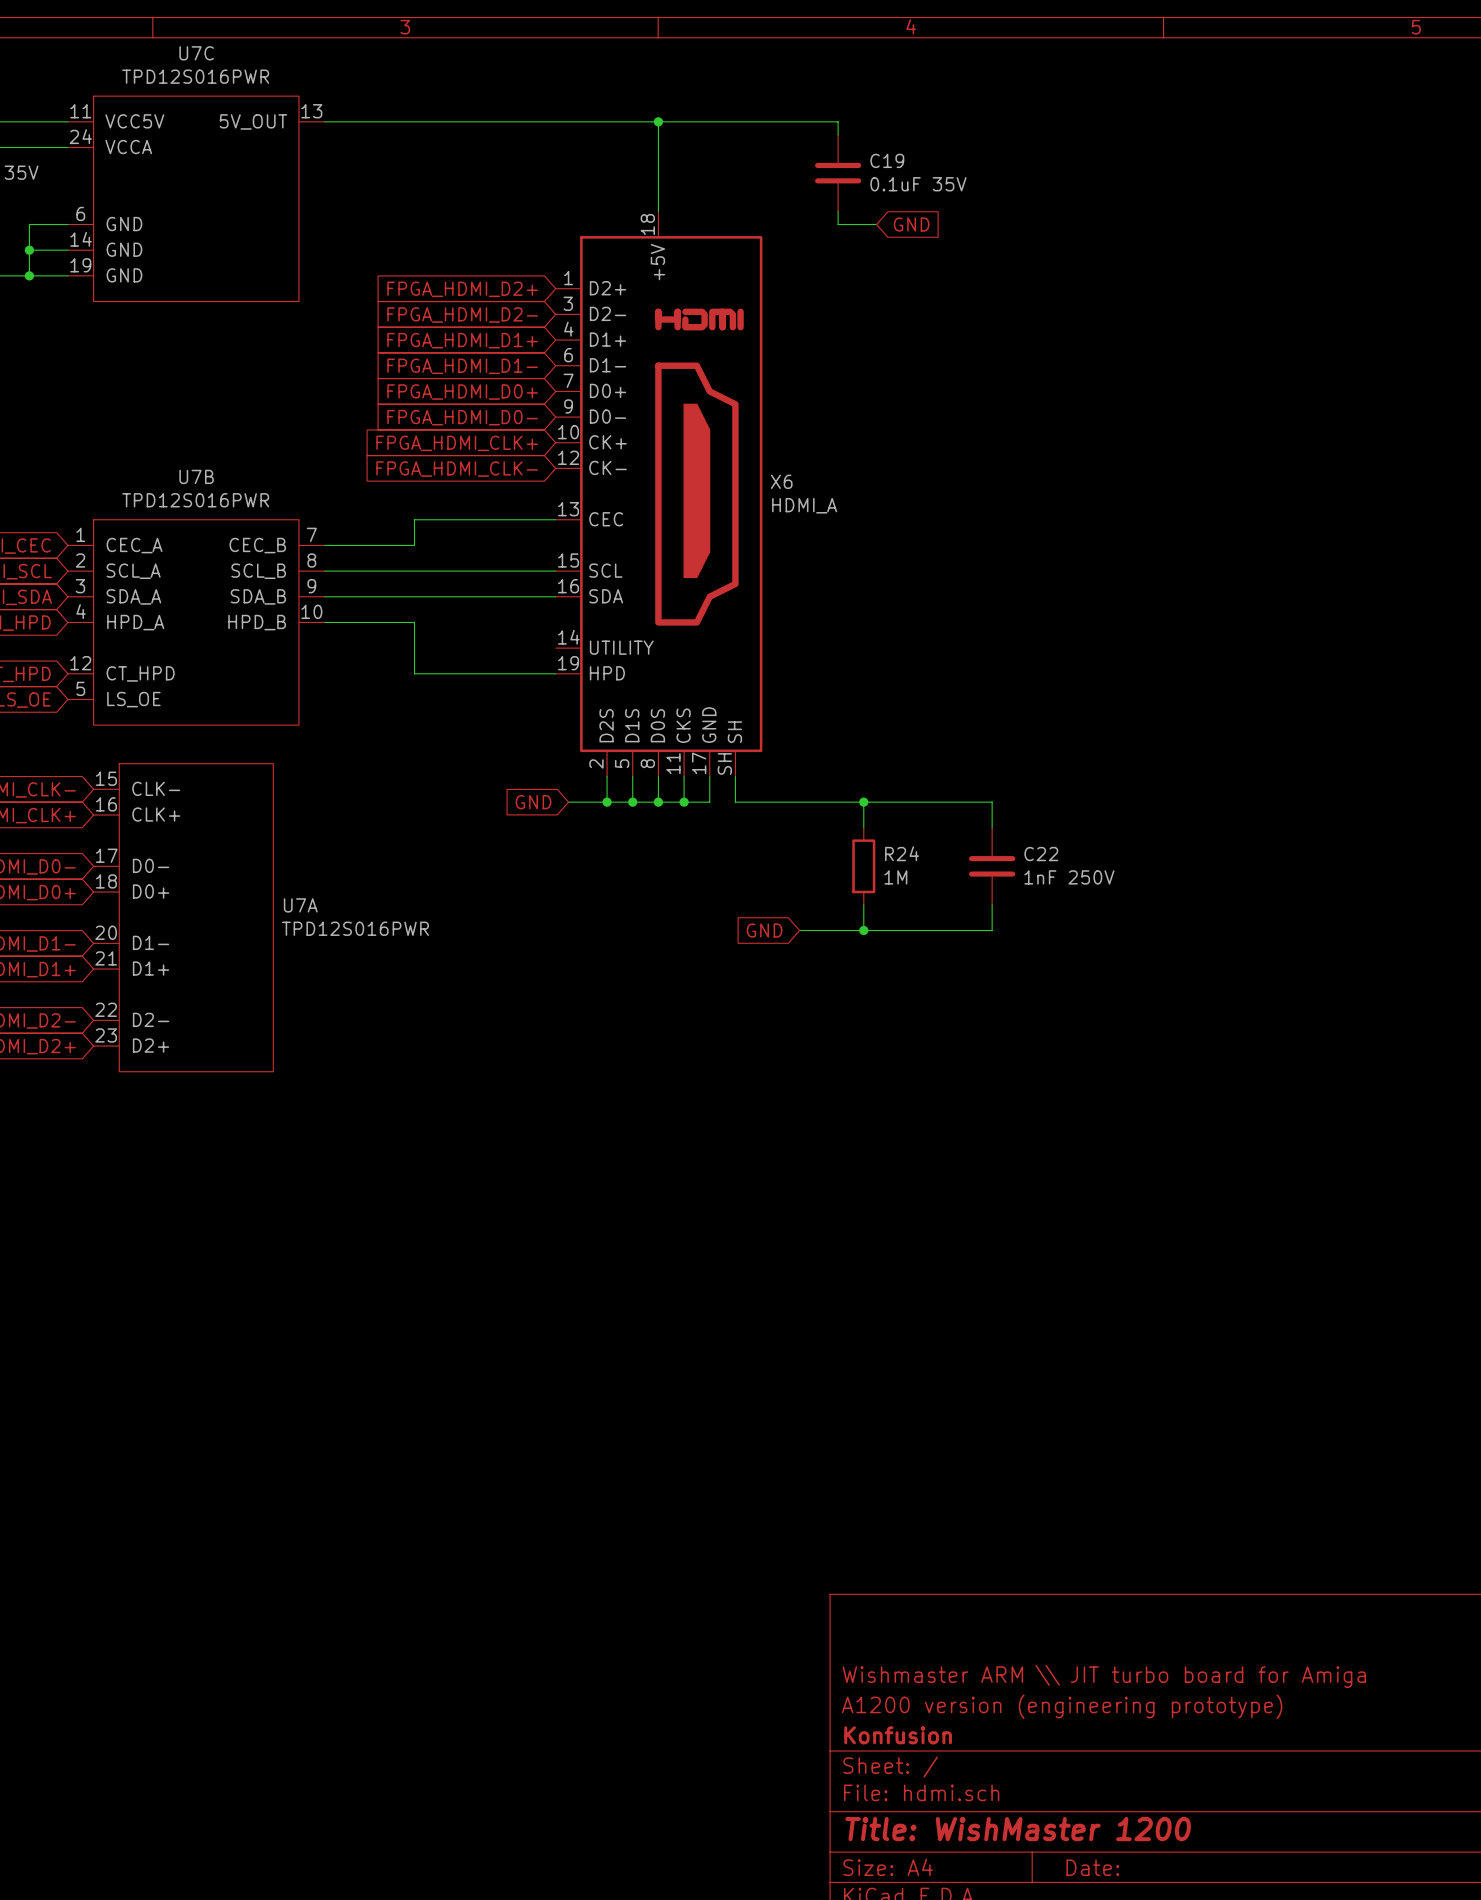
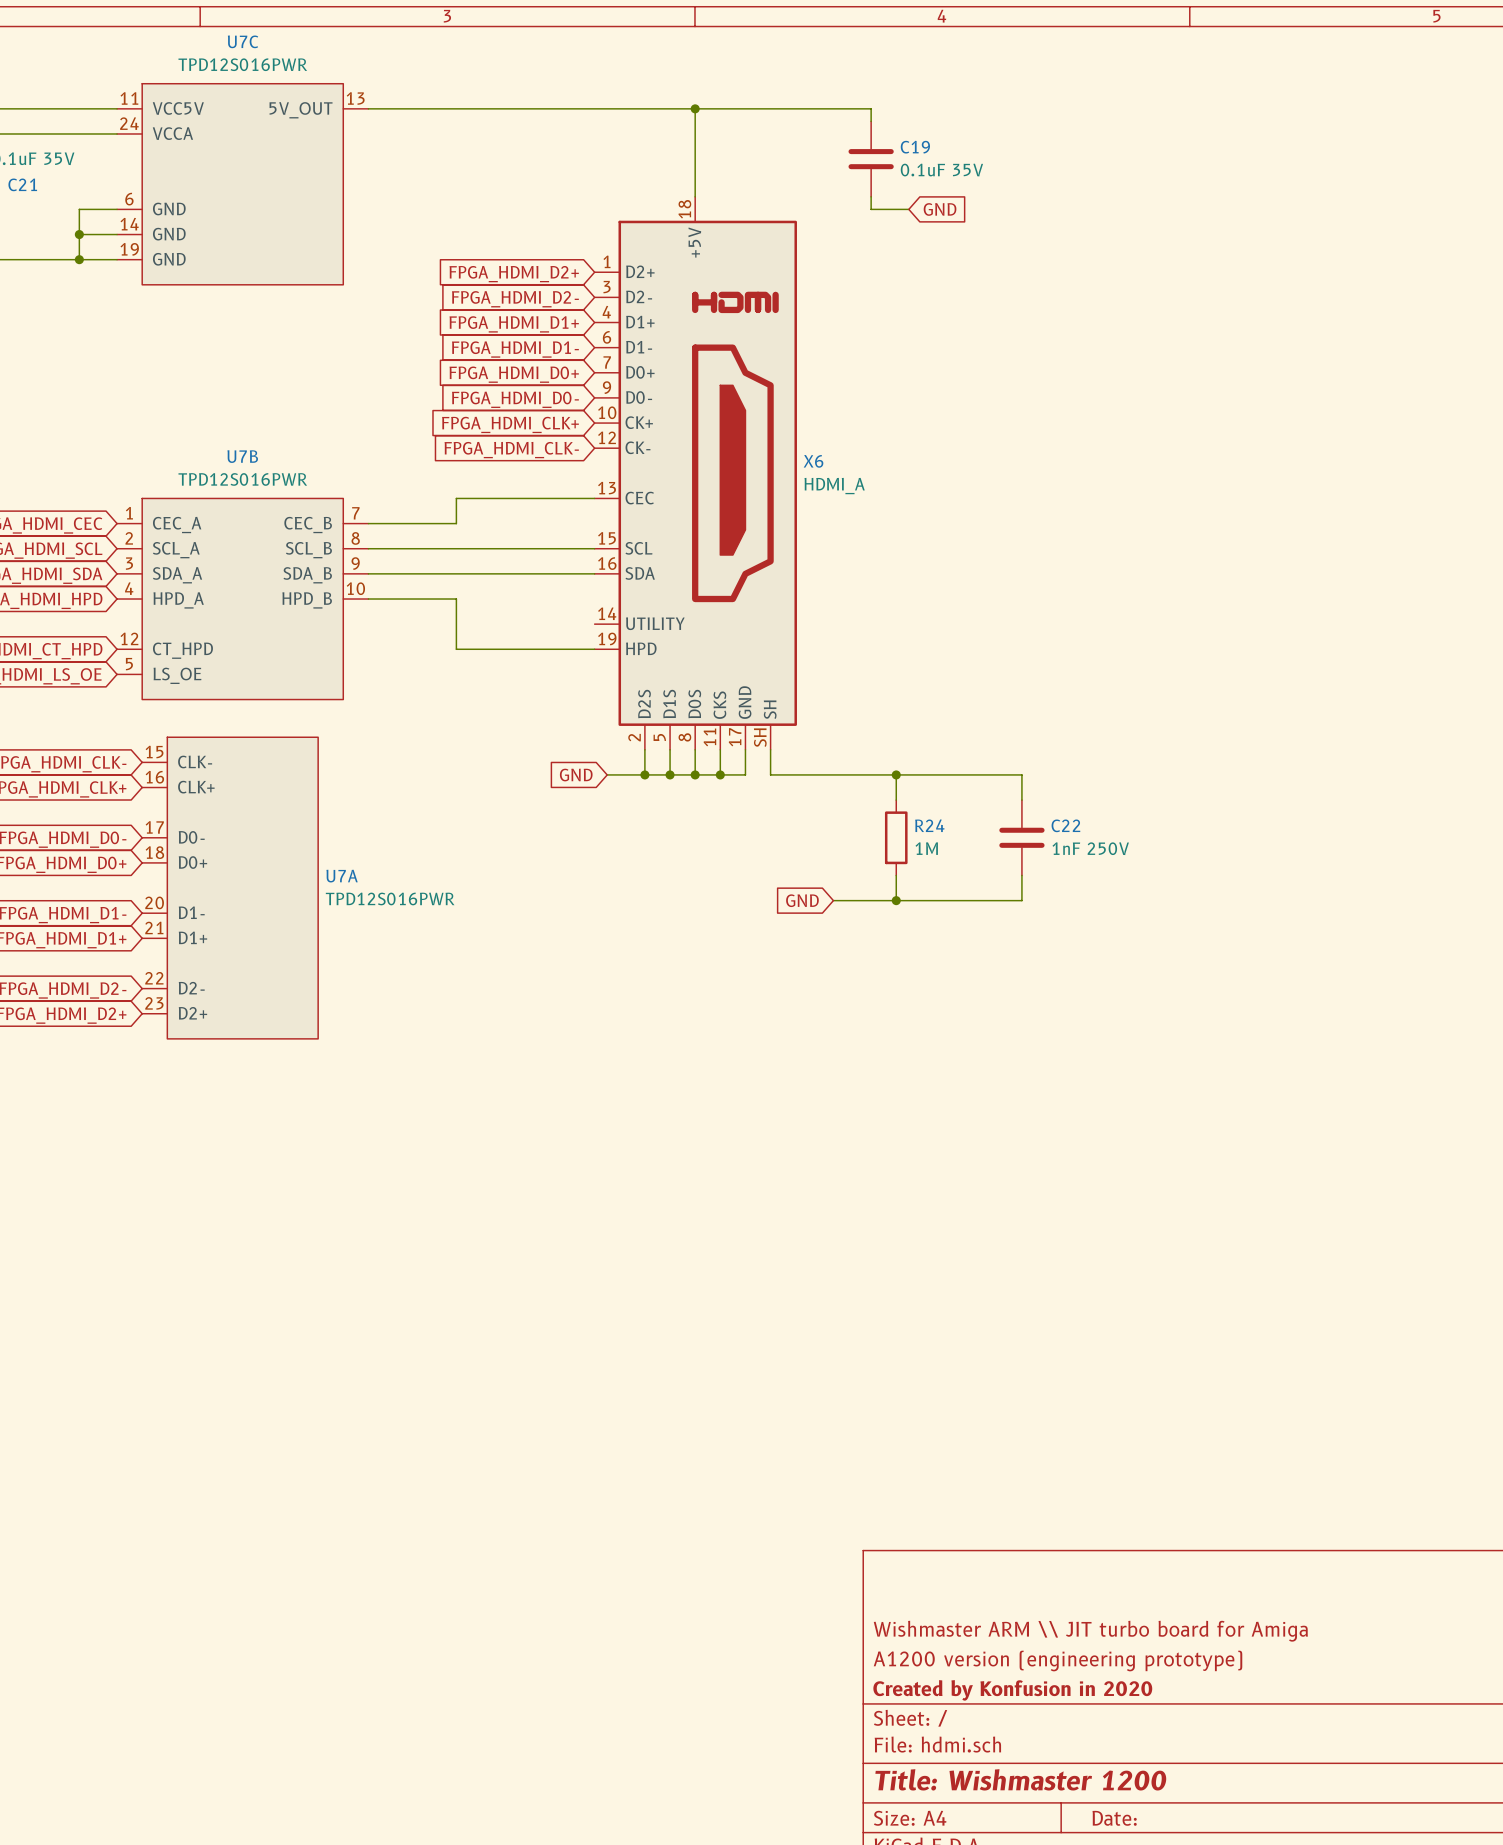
title block: Konfusion (898, 1735) -> Created by Konfusion in 2020 (1012, 1690)
title block: Title: WishMaster 1200 (1018, 1829) -> Title: Wishmaster 1200 (1020, 1779)

